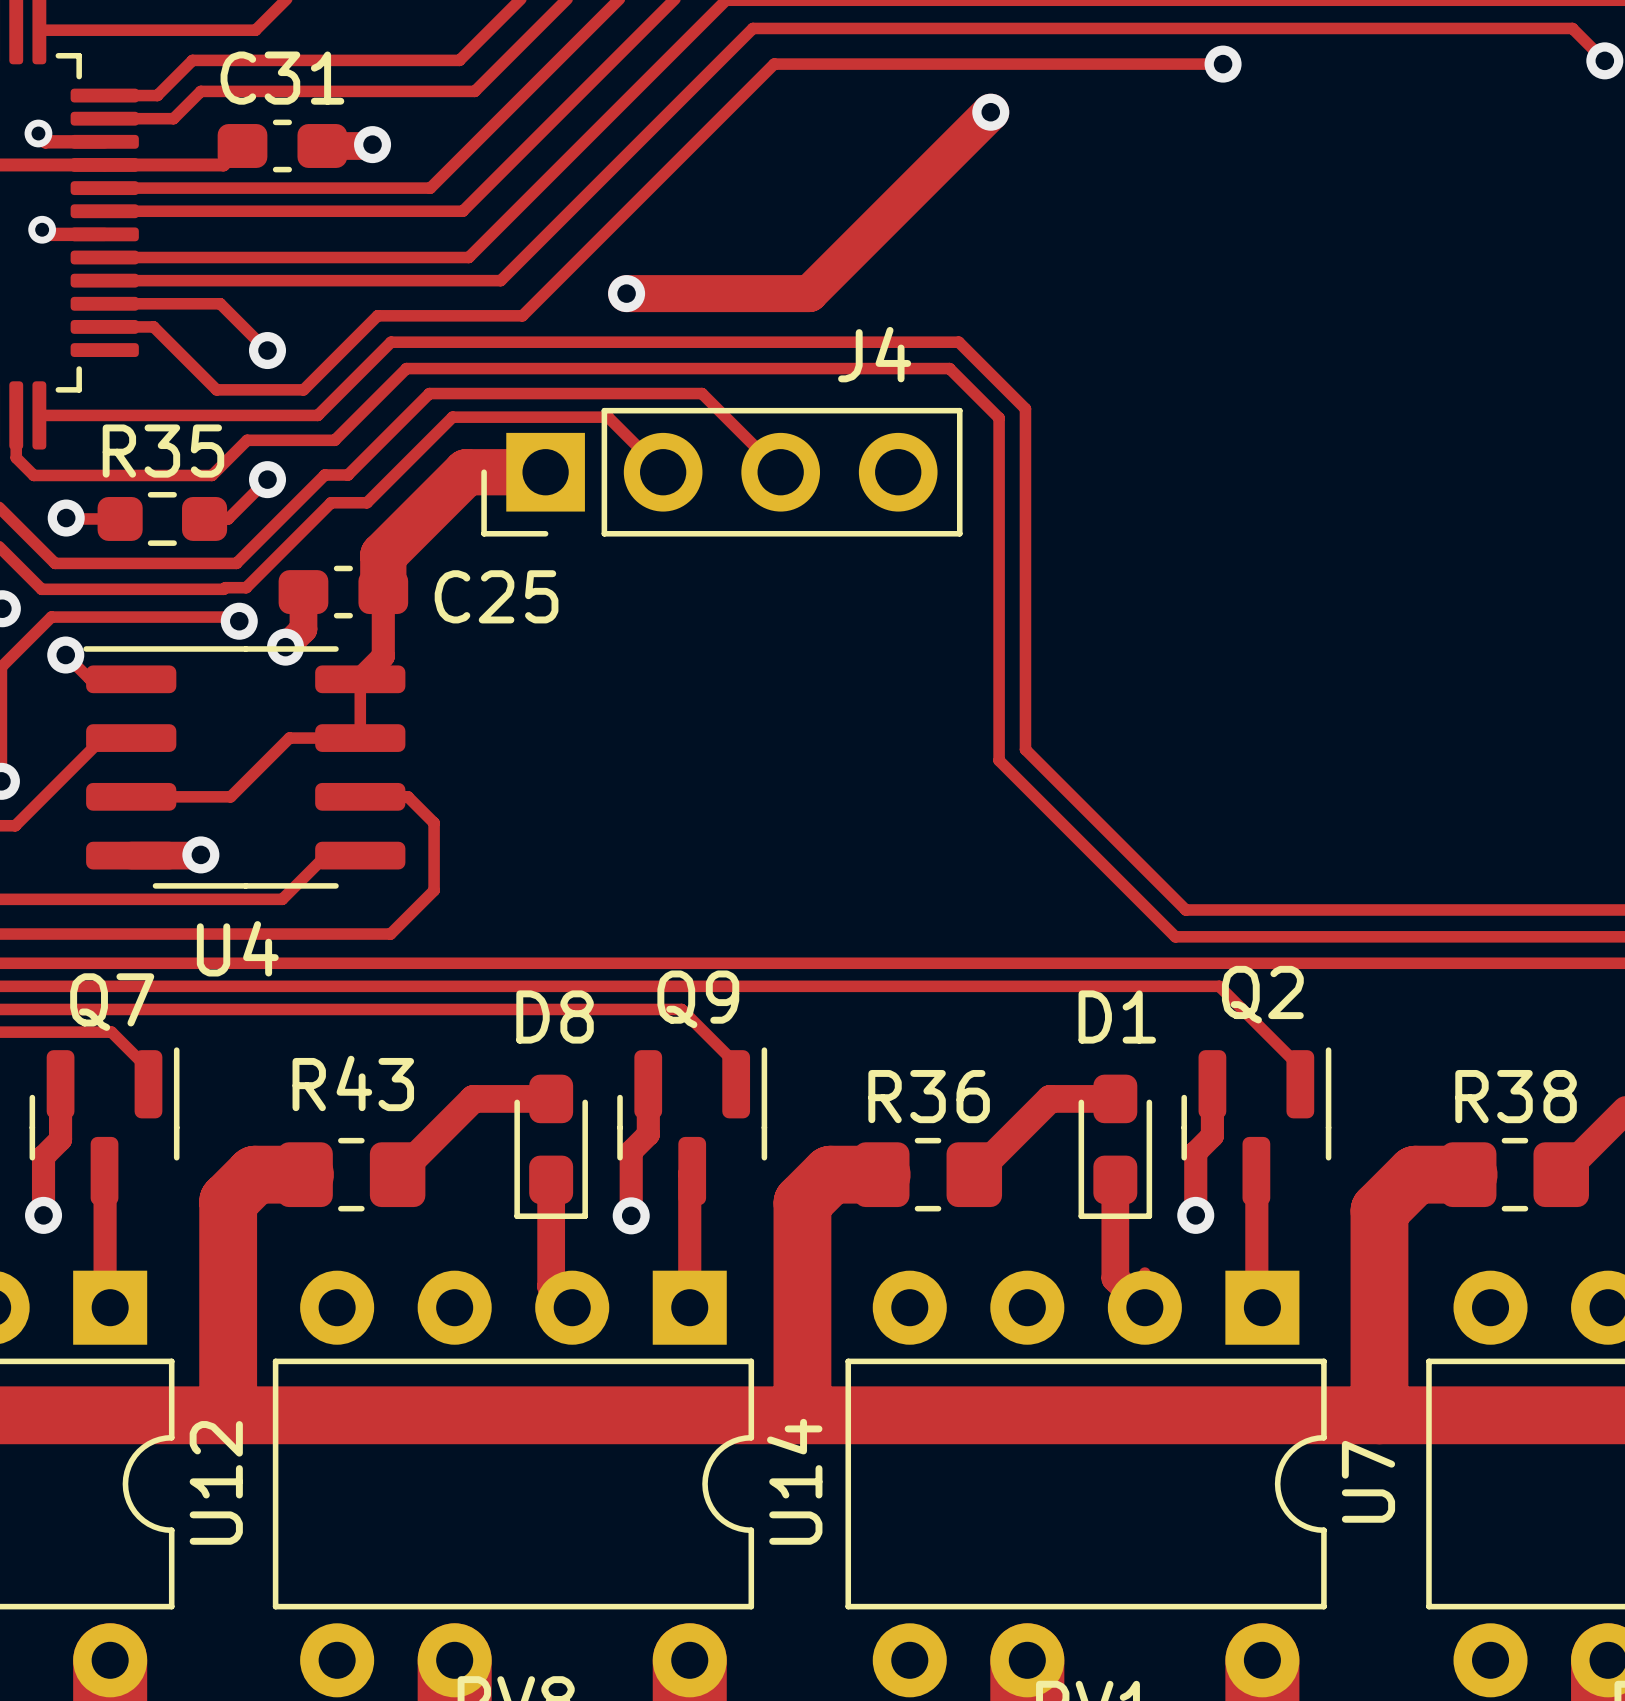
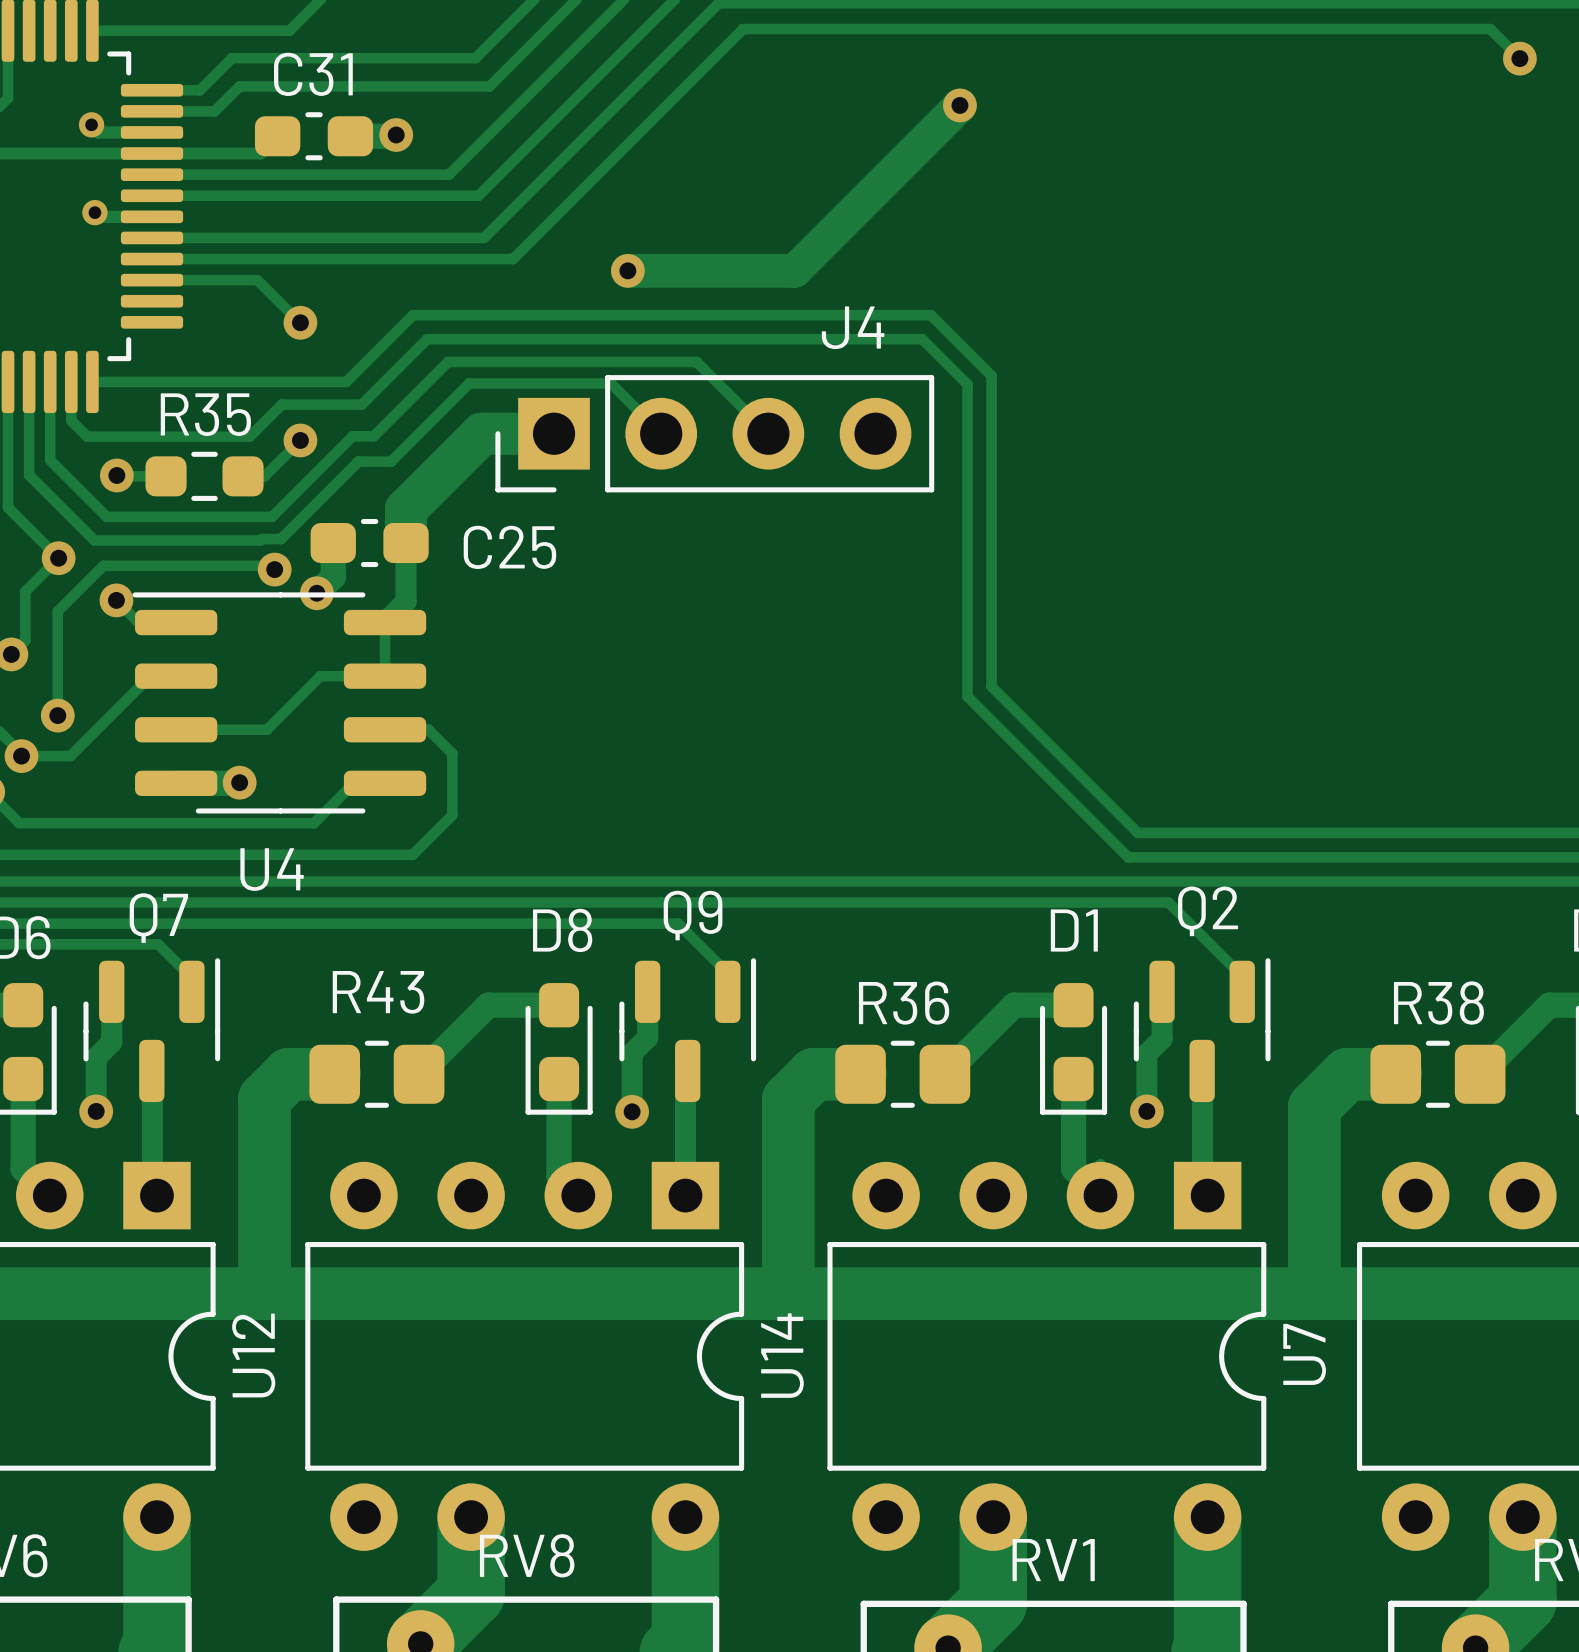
track: (1223, 64) (774, 64) (522, 315) (377, 315) (303, 389) (216, 389) (153, 326) (104, 326) -> none
via: (1223, 64) -> none

